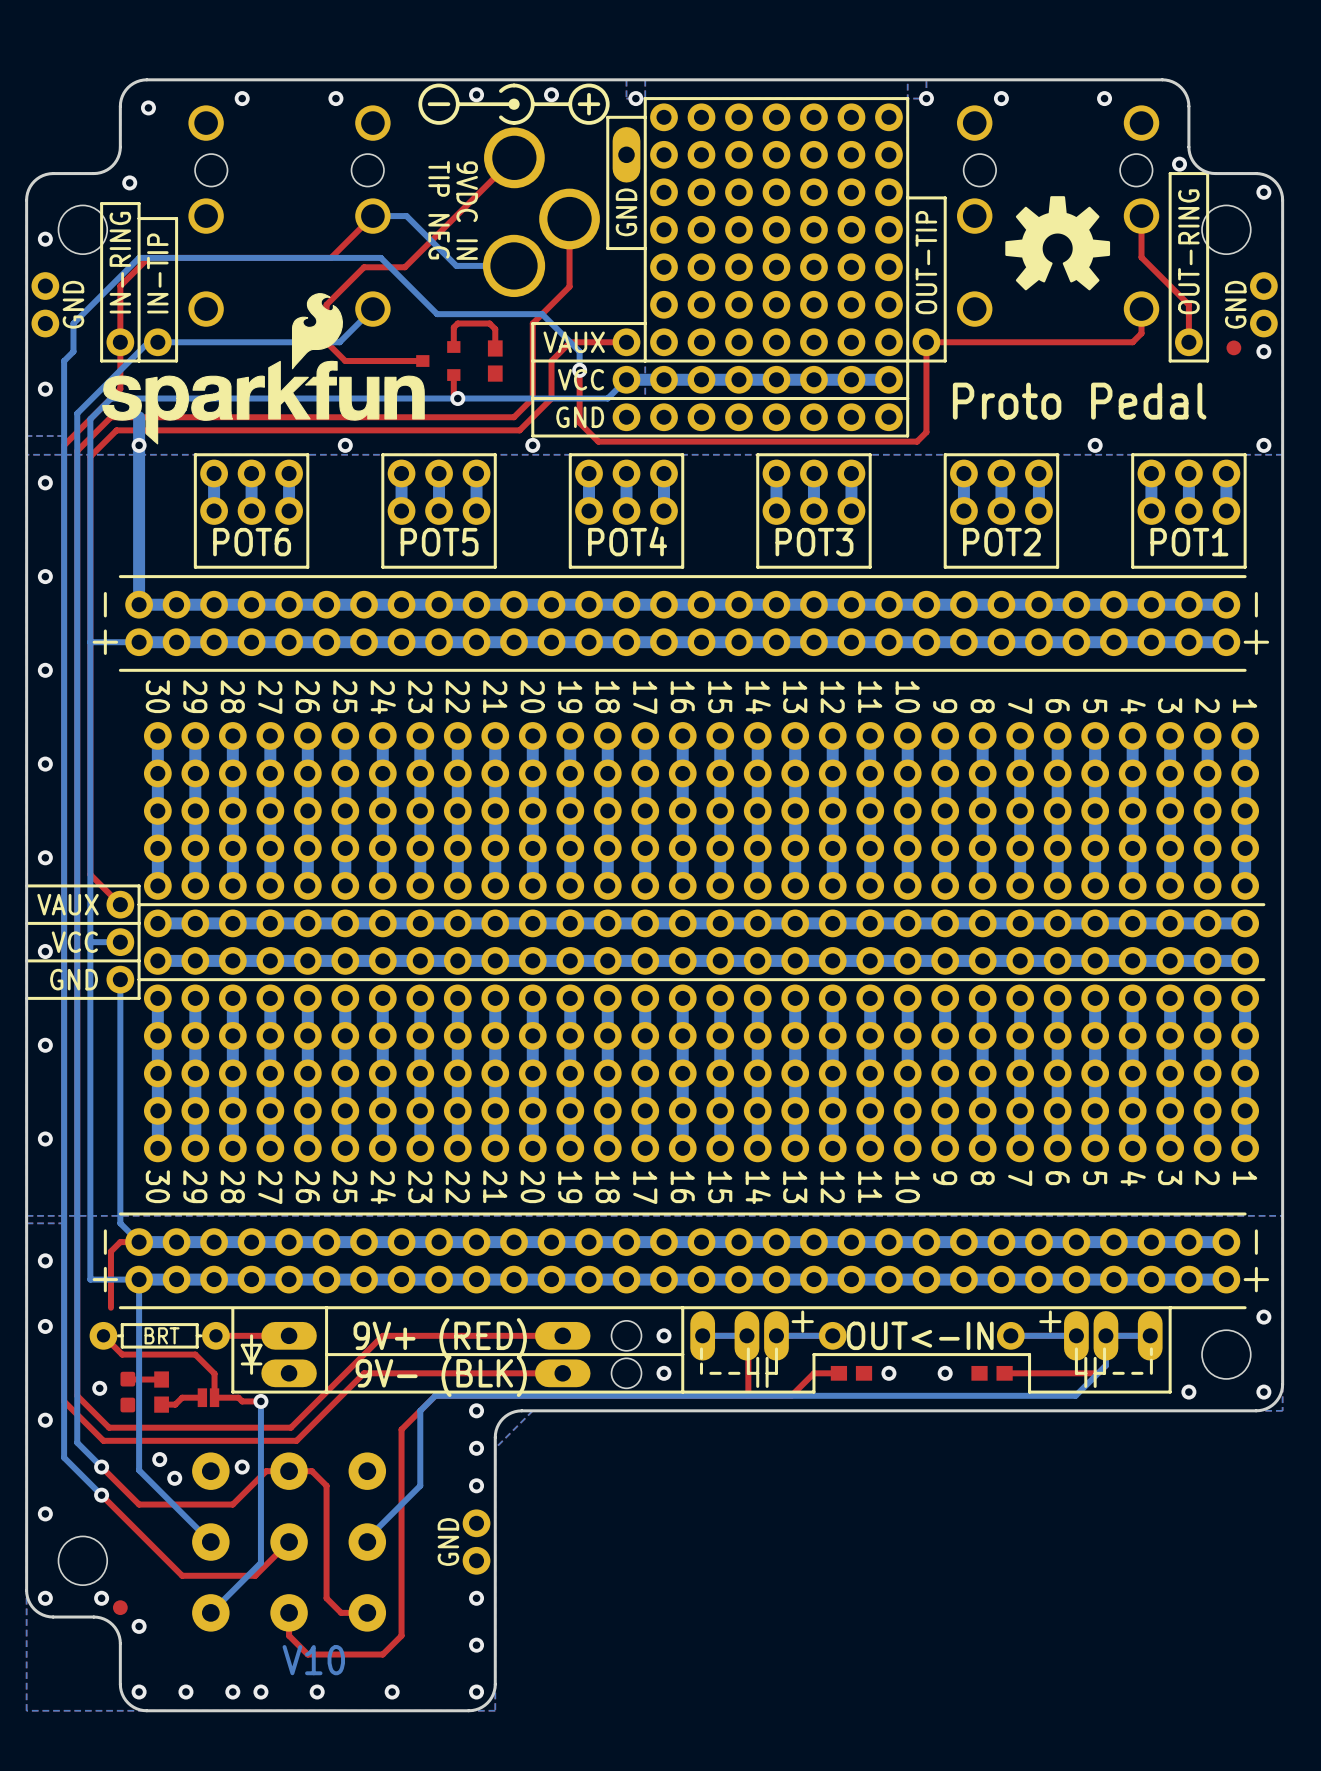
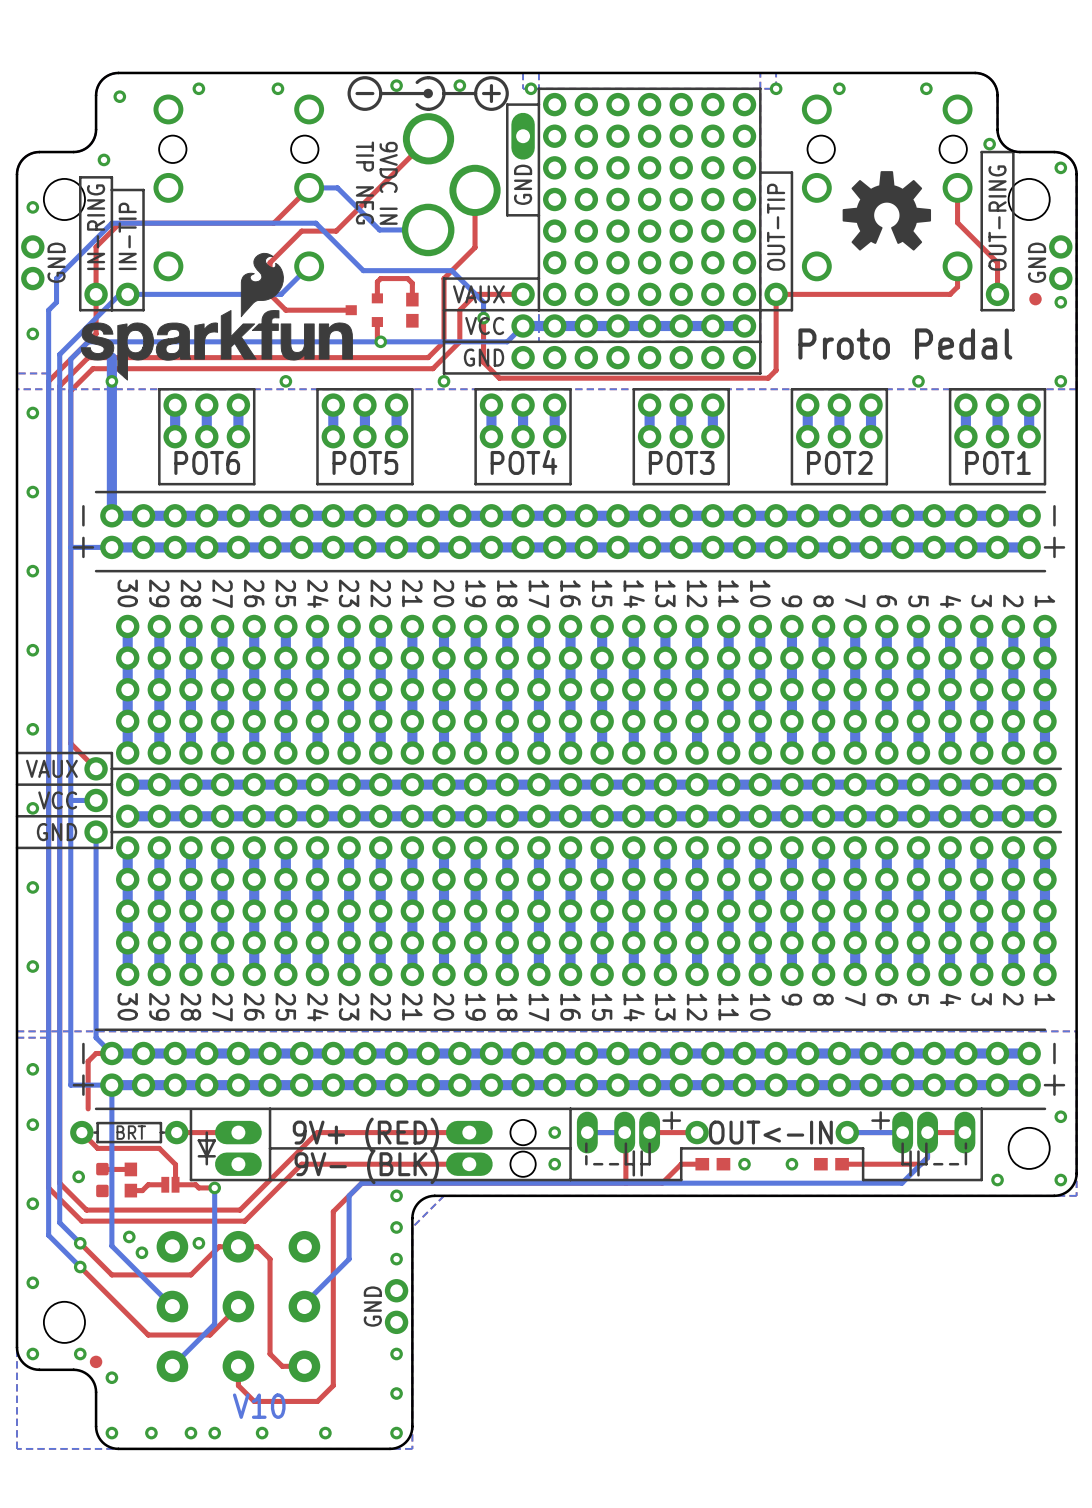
bottom track: (832, 1335) (776, 1335) -> none
bottom track: (1150, 1335) (1105, 1335) -> none

